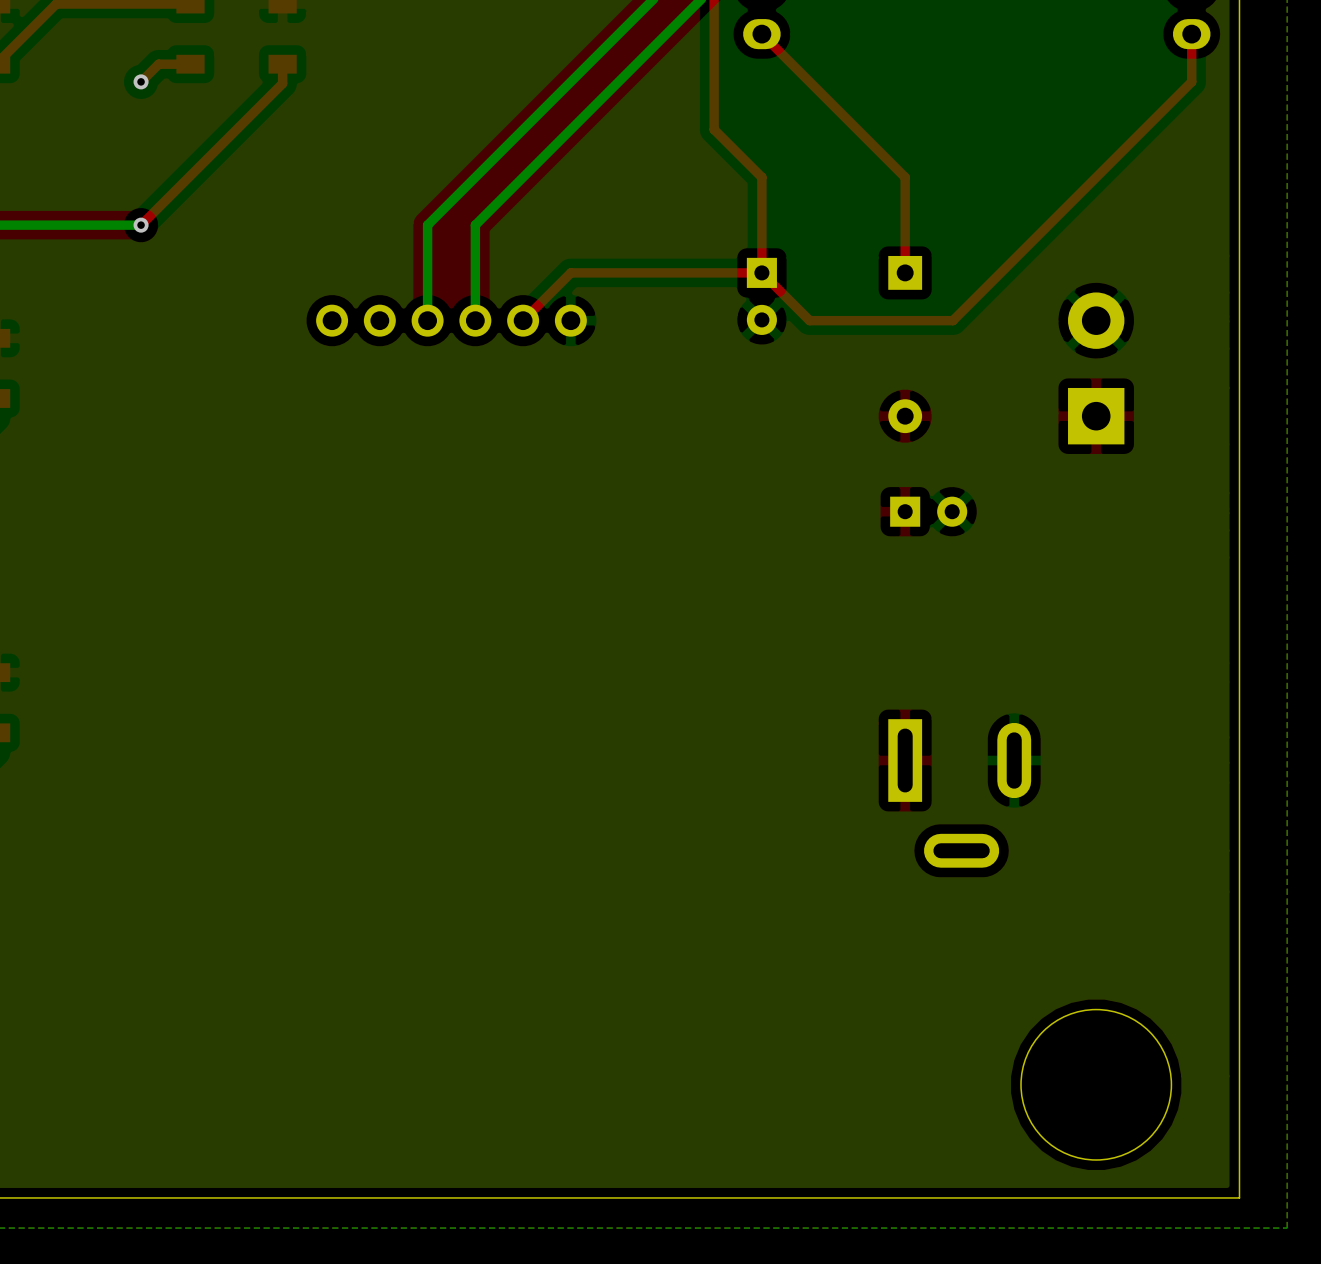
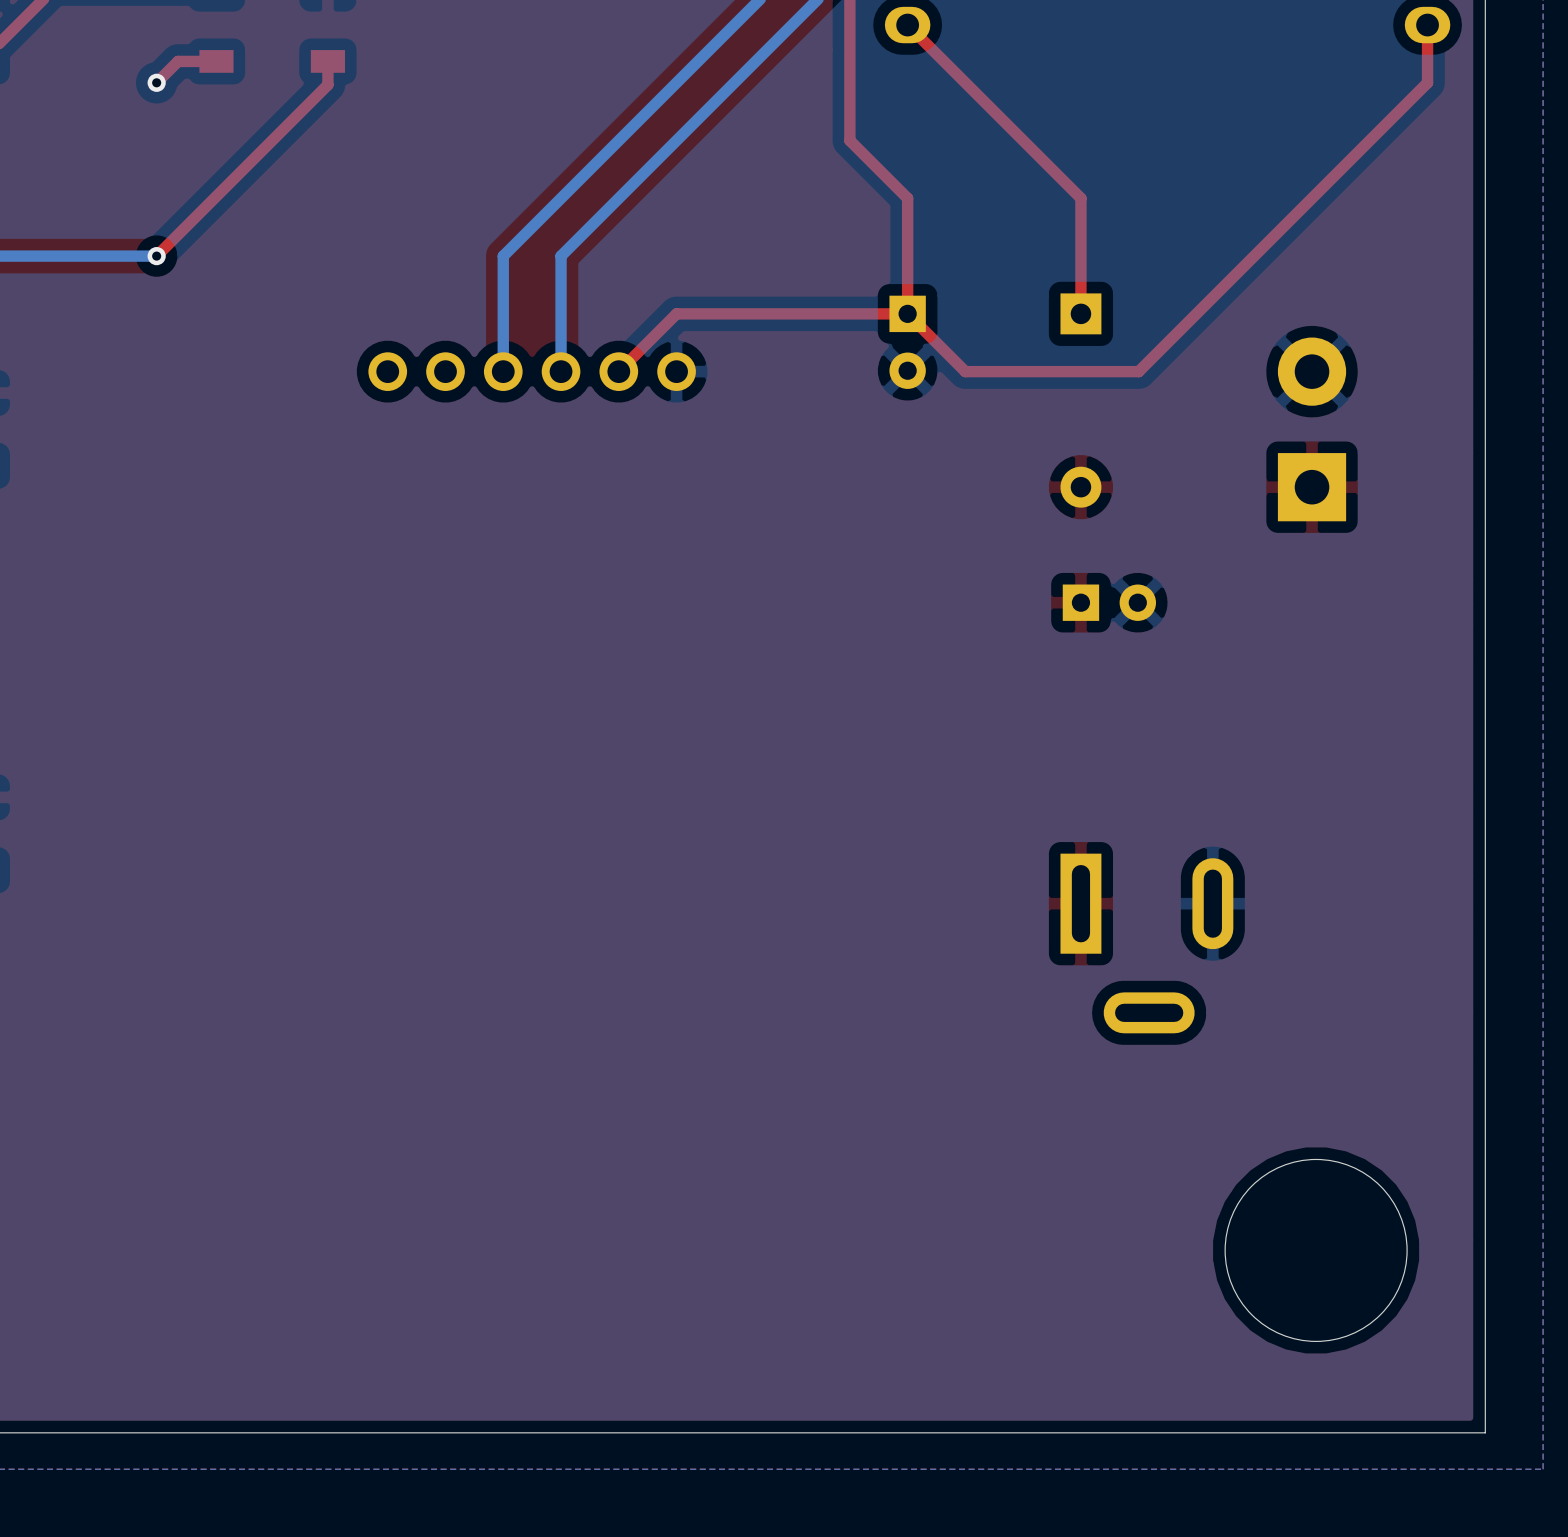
round board edge position: (1096, 1084) -> (1316, 1250)

